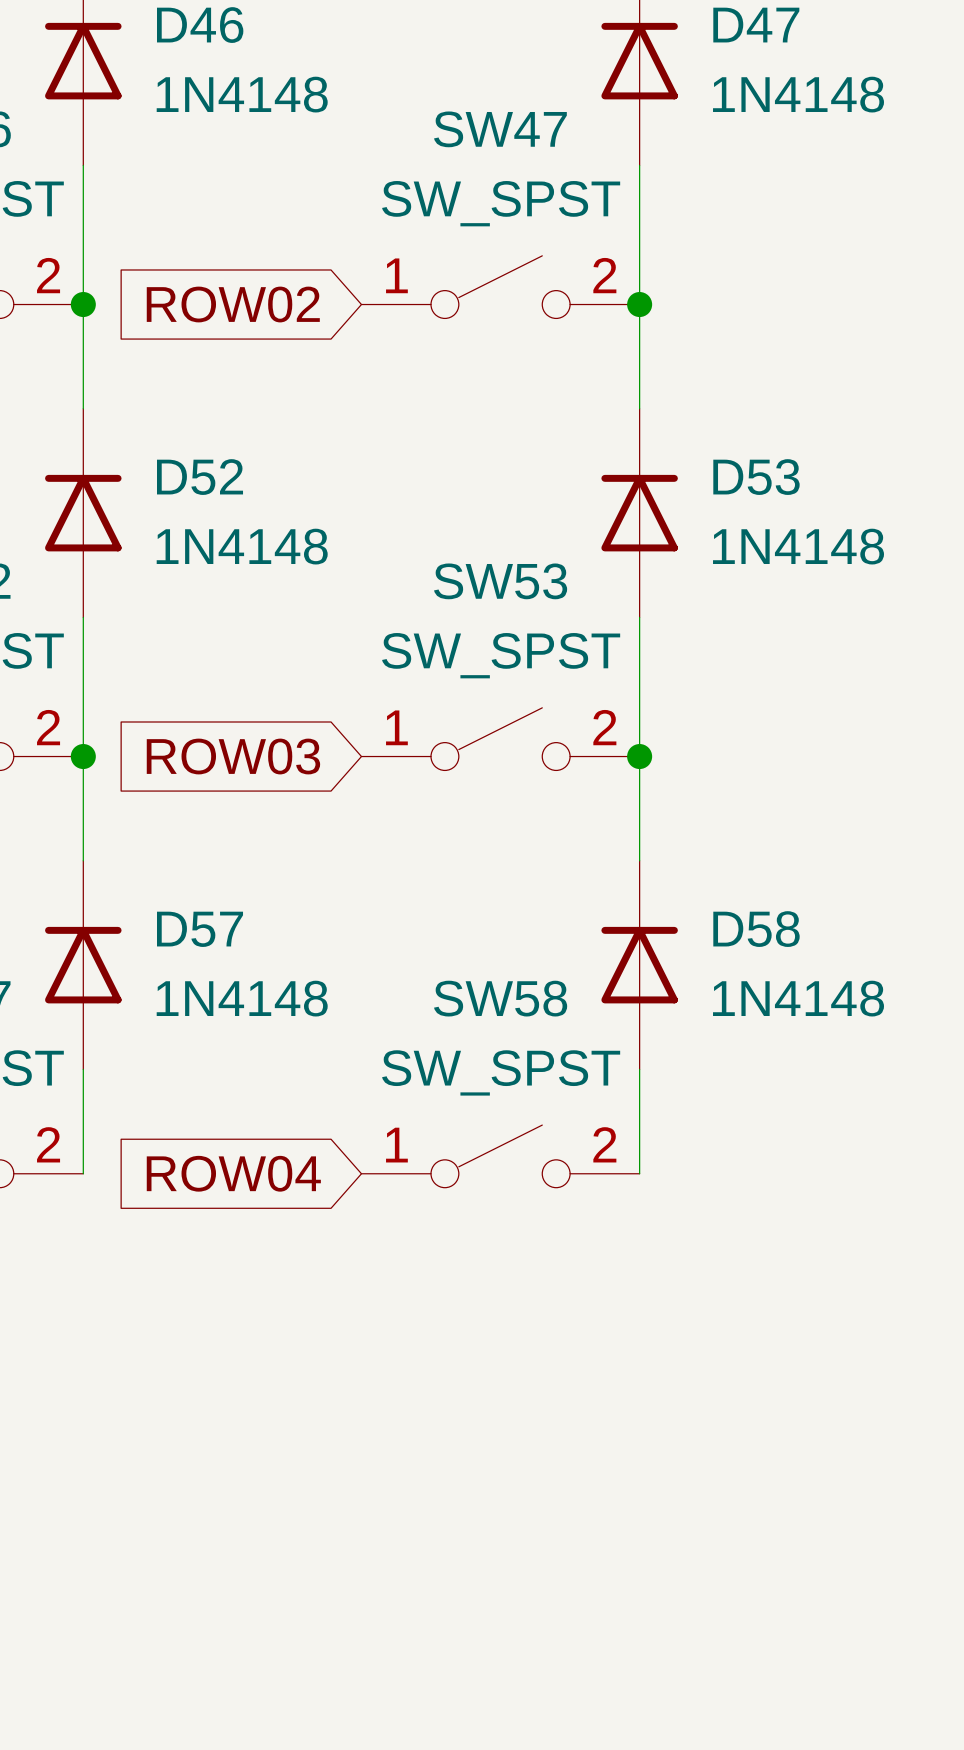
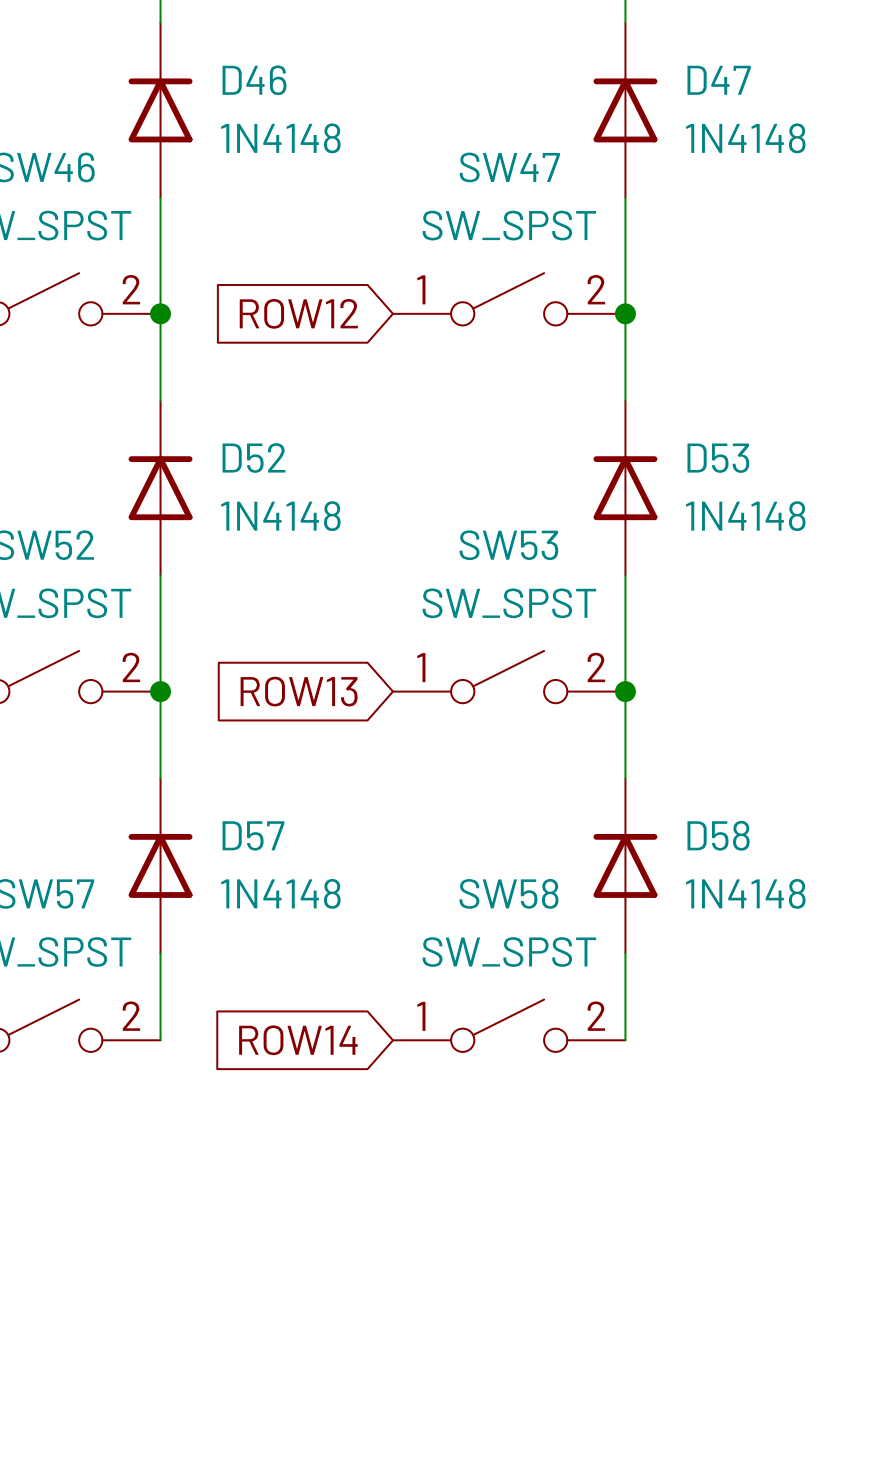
global label: ROW02 (233, 304) -> ROW12 (298, 313)
global label: ROW03 (233, 756) -> ROW13 (299, 691)
global label: ROW04 (233, 1173) -> ROW14 (298, 1040)

